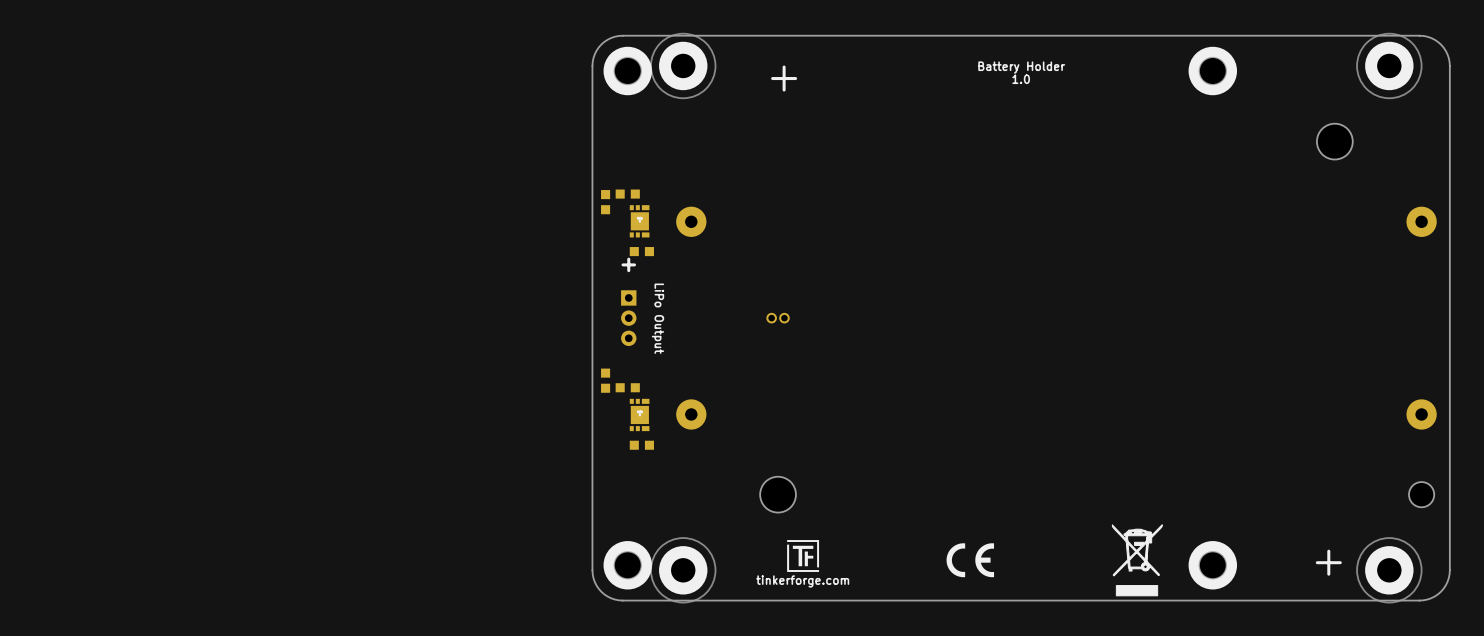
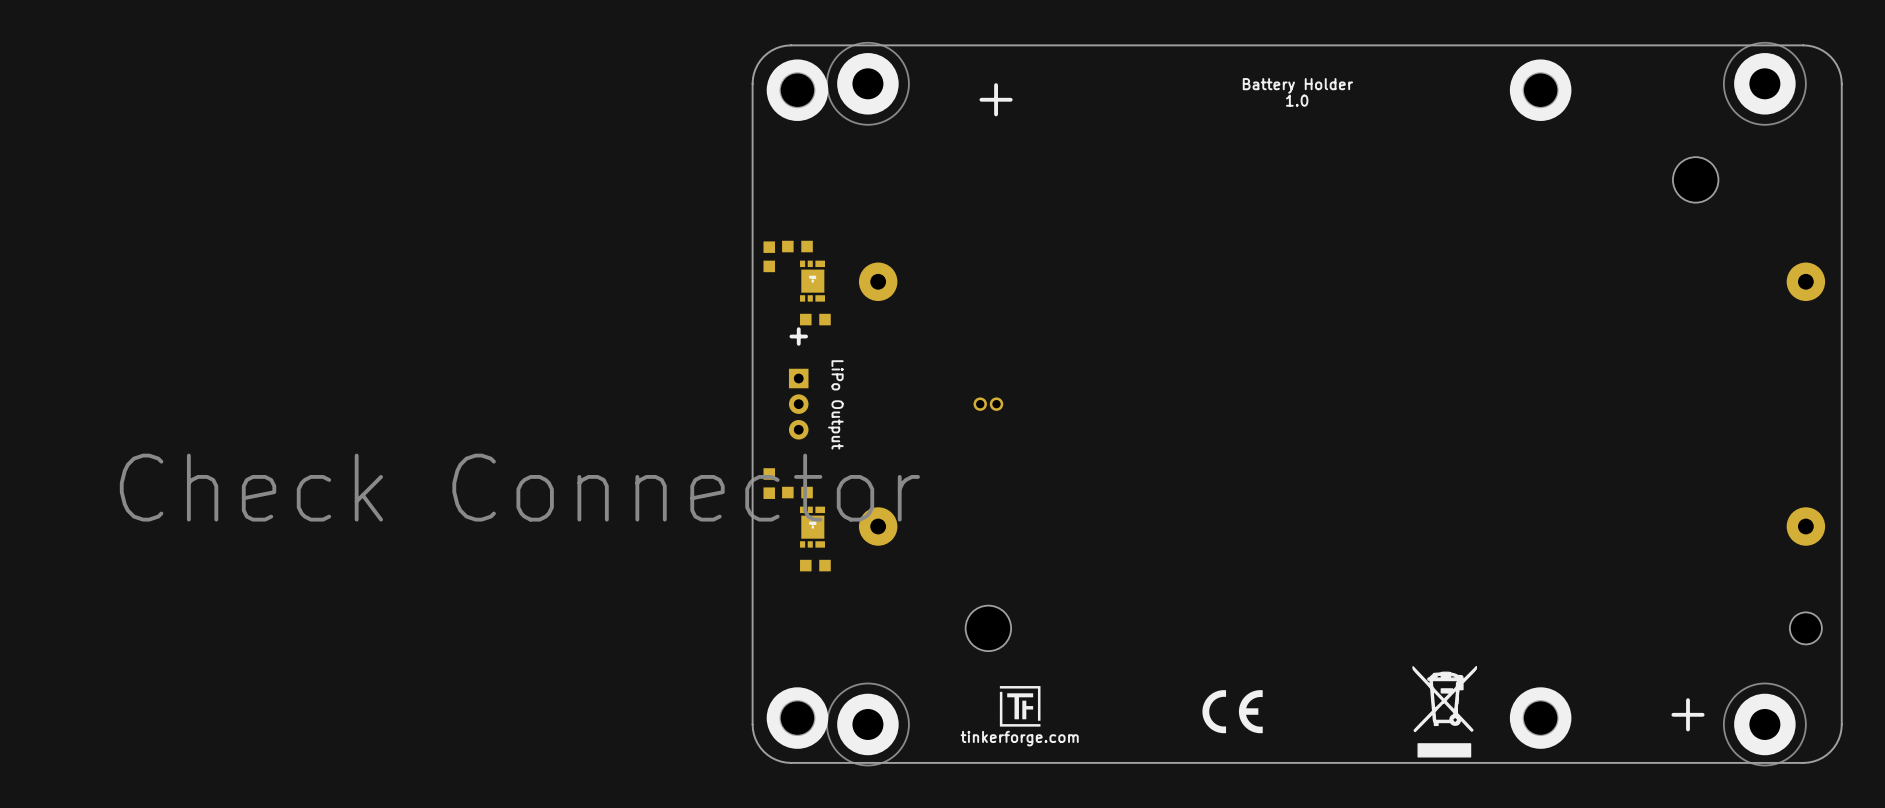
text: none -> Check Connector (519, 487)

